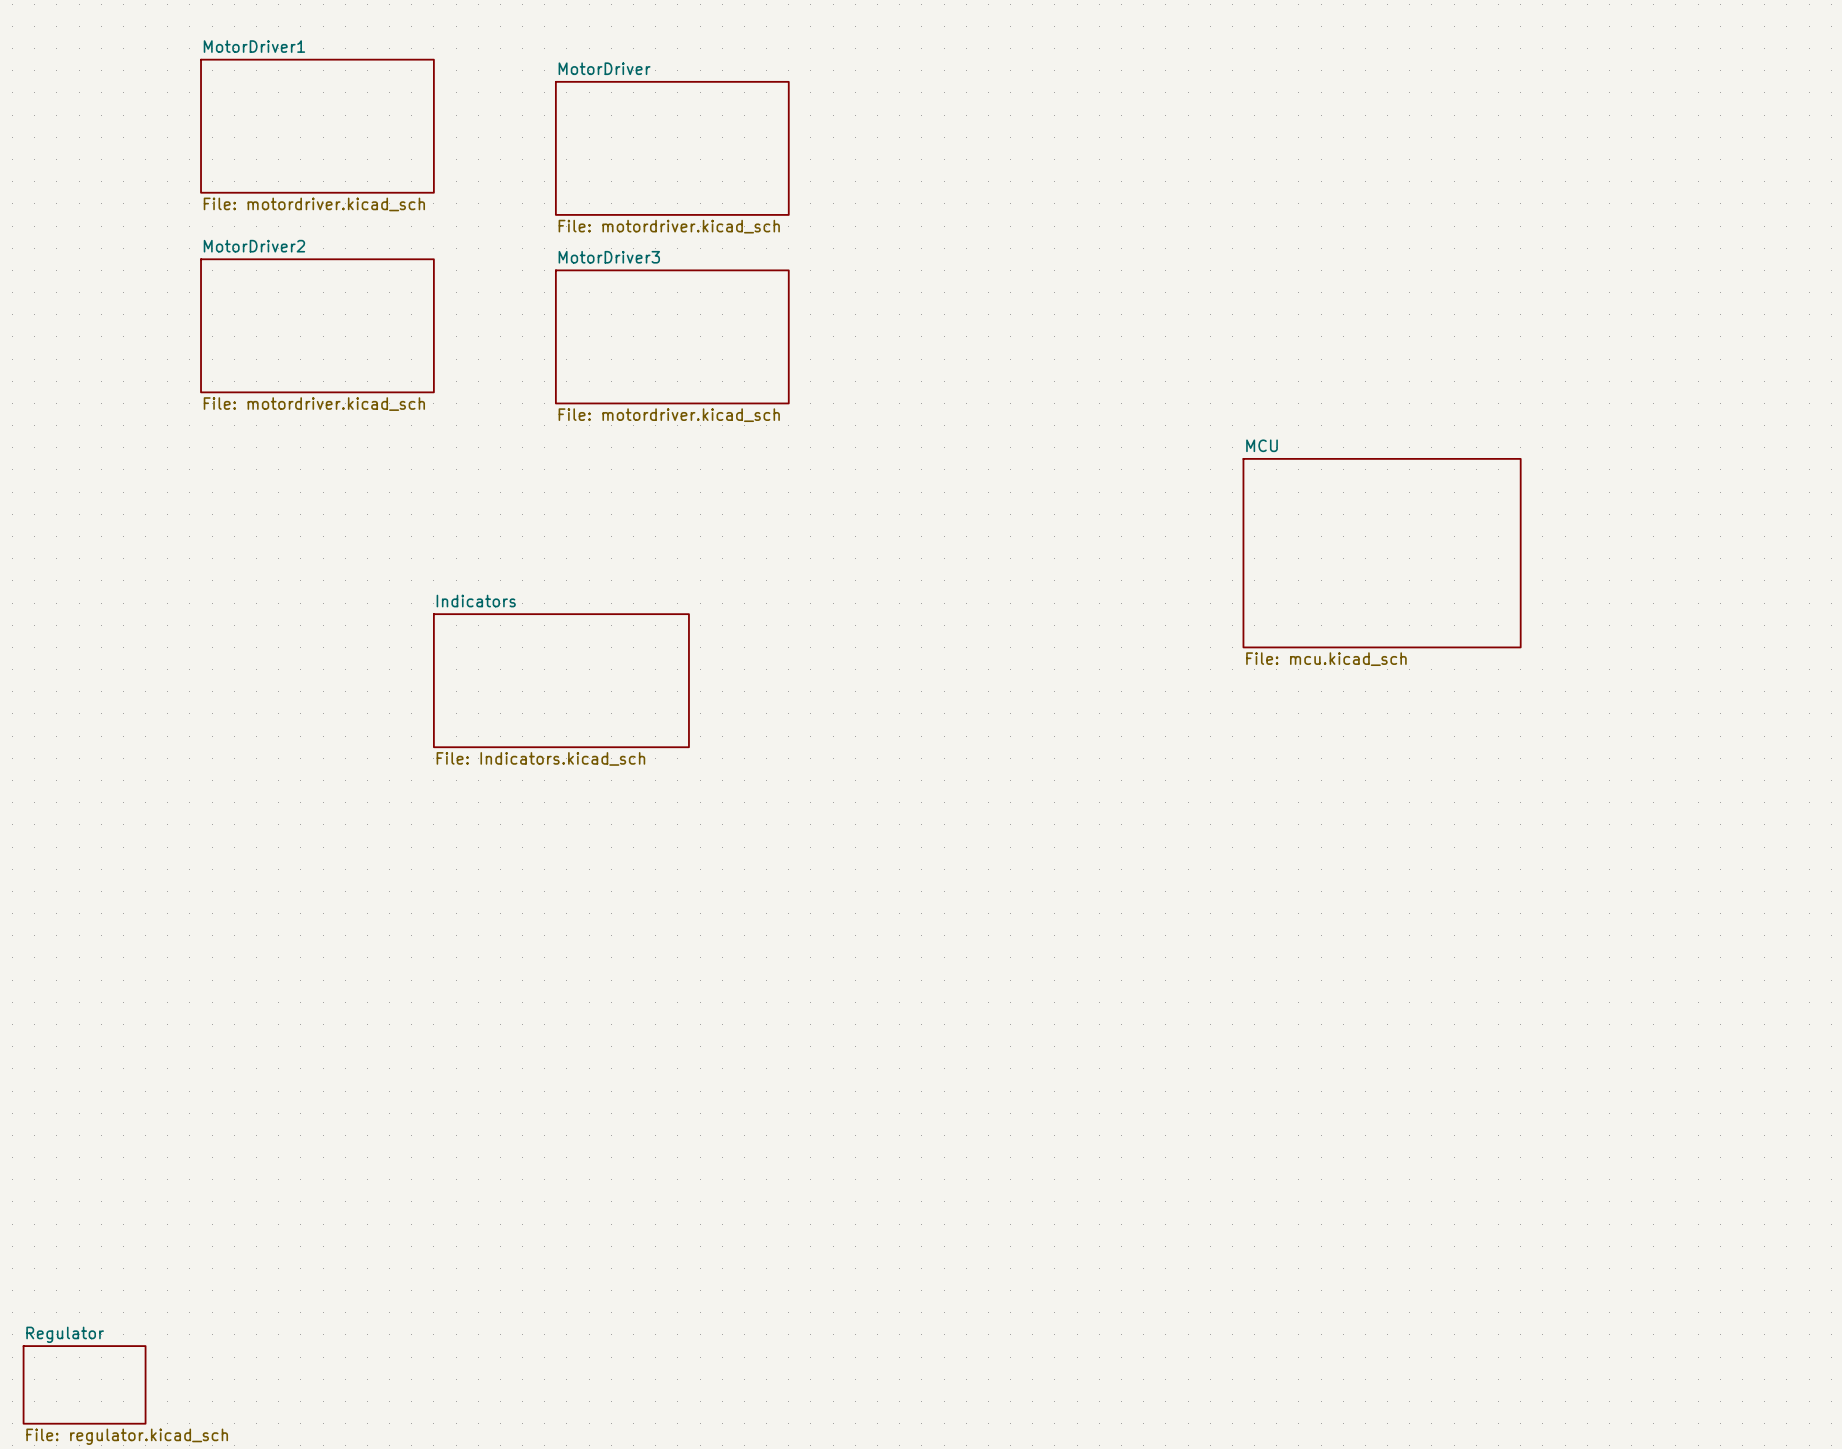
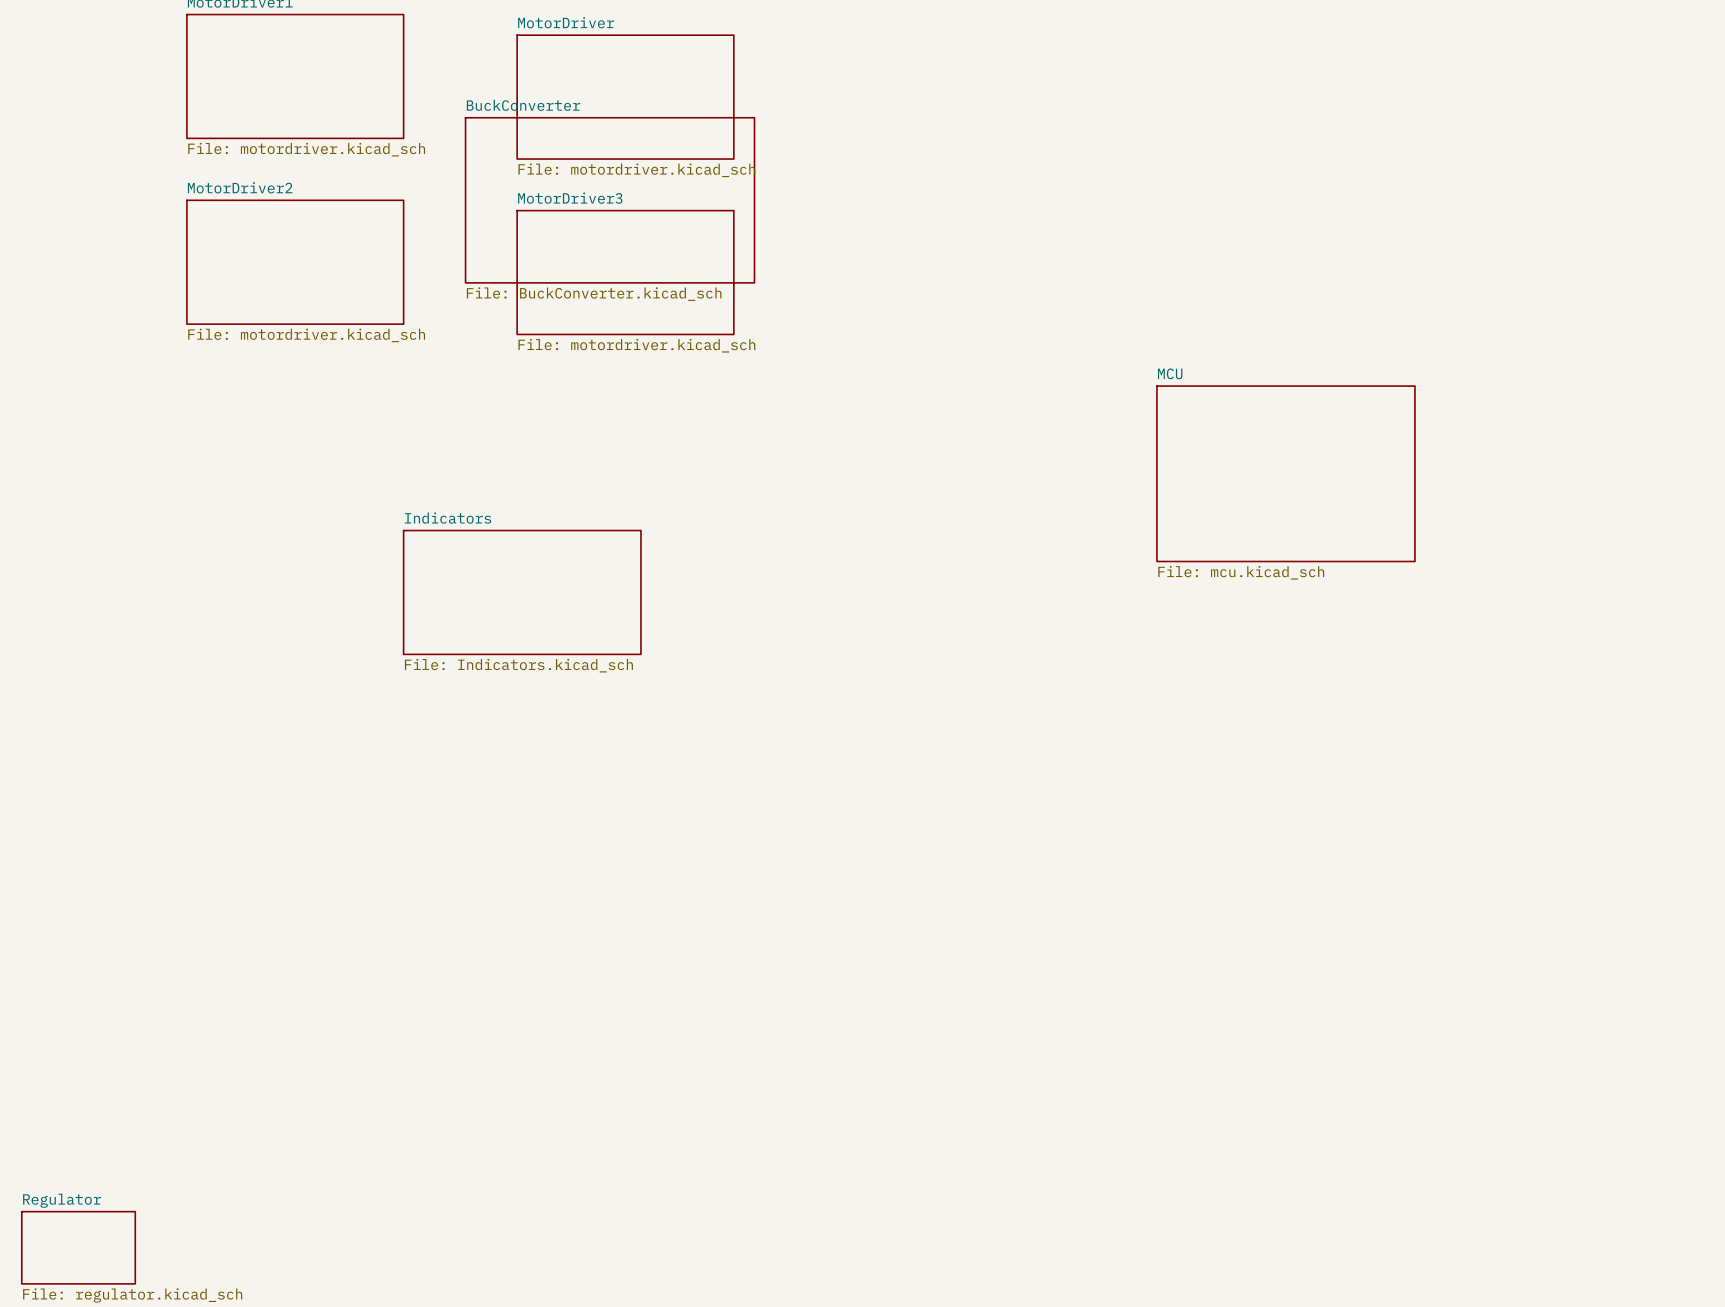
sheet BuckConverter: none -> File: BuckConverter.kicad_sch (610, 200)

